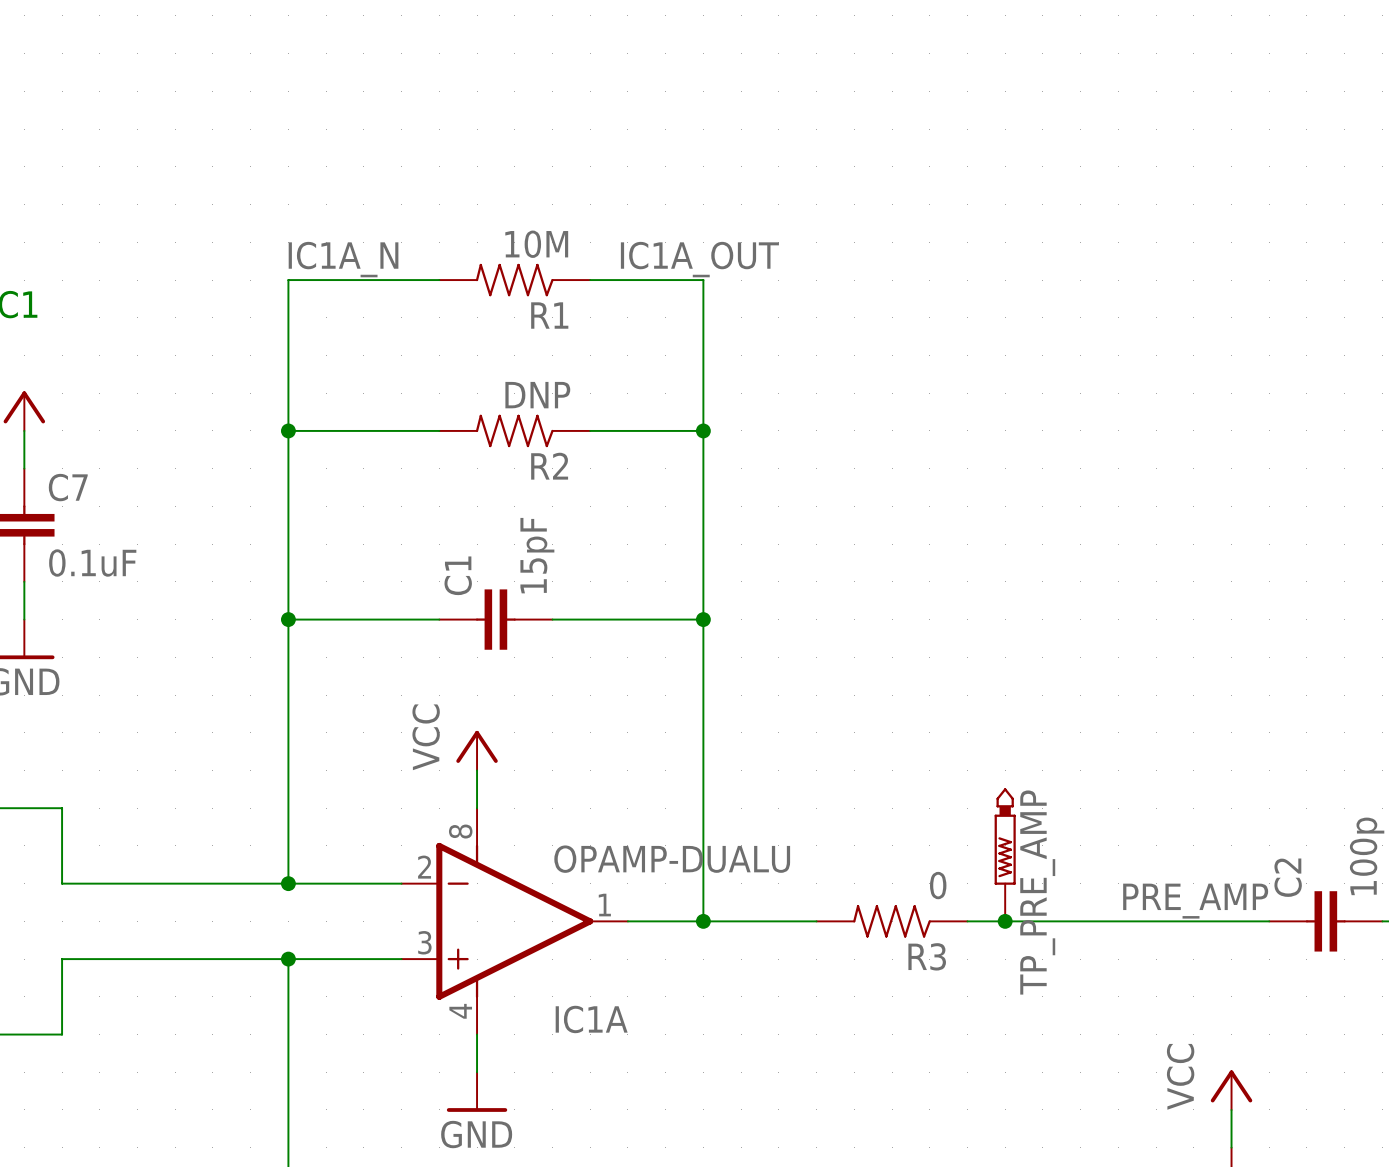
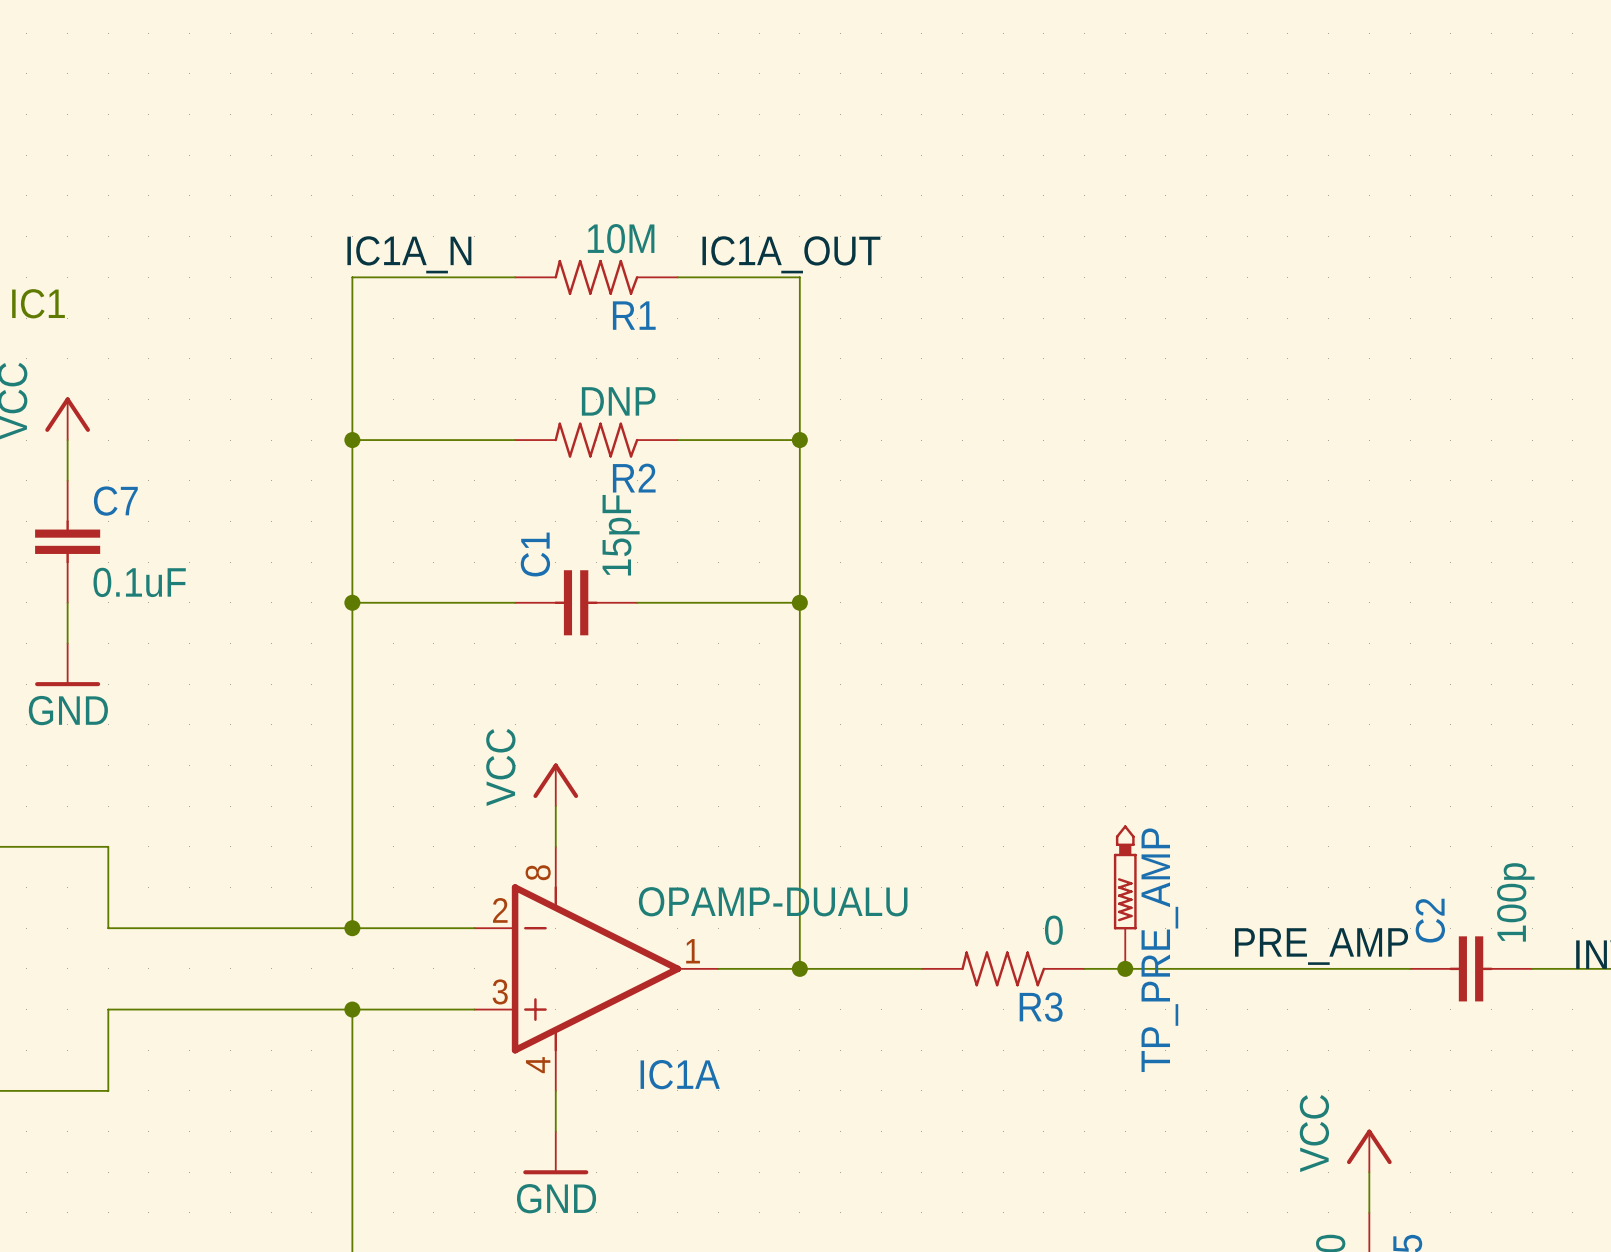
wire: (288, 619) (439, 619) -> (352, 602) (515, 602)
junction position: (288, 619) -> (352, 602)
C1 position: (495, 619) -> (576, 602)
wire: (552, 619) (703, 619) -> (637, 602) (799, 602)
junction position: (703, 619) -> (799, 602)

